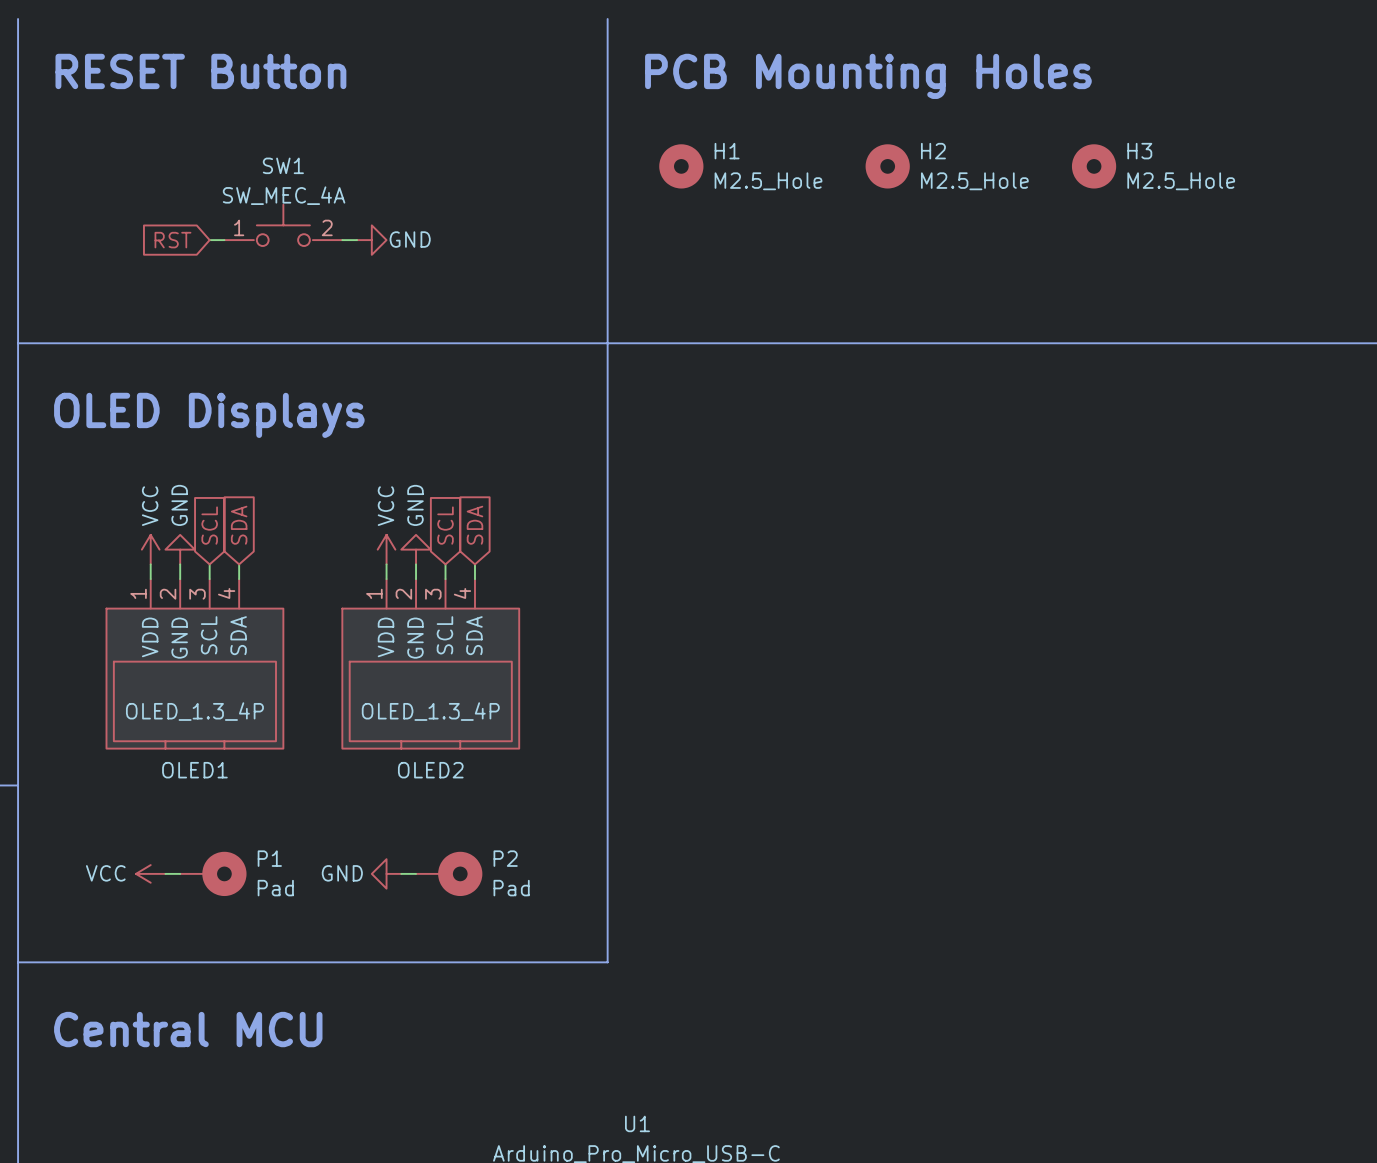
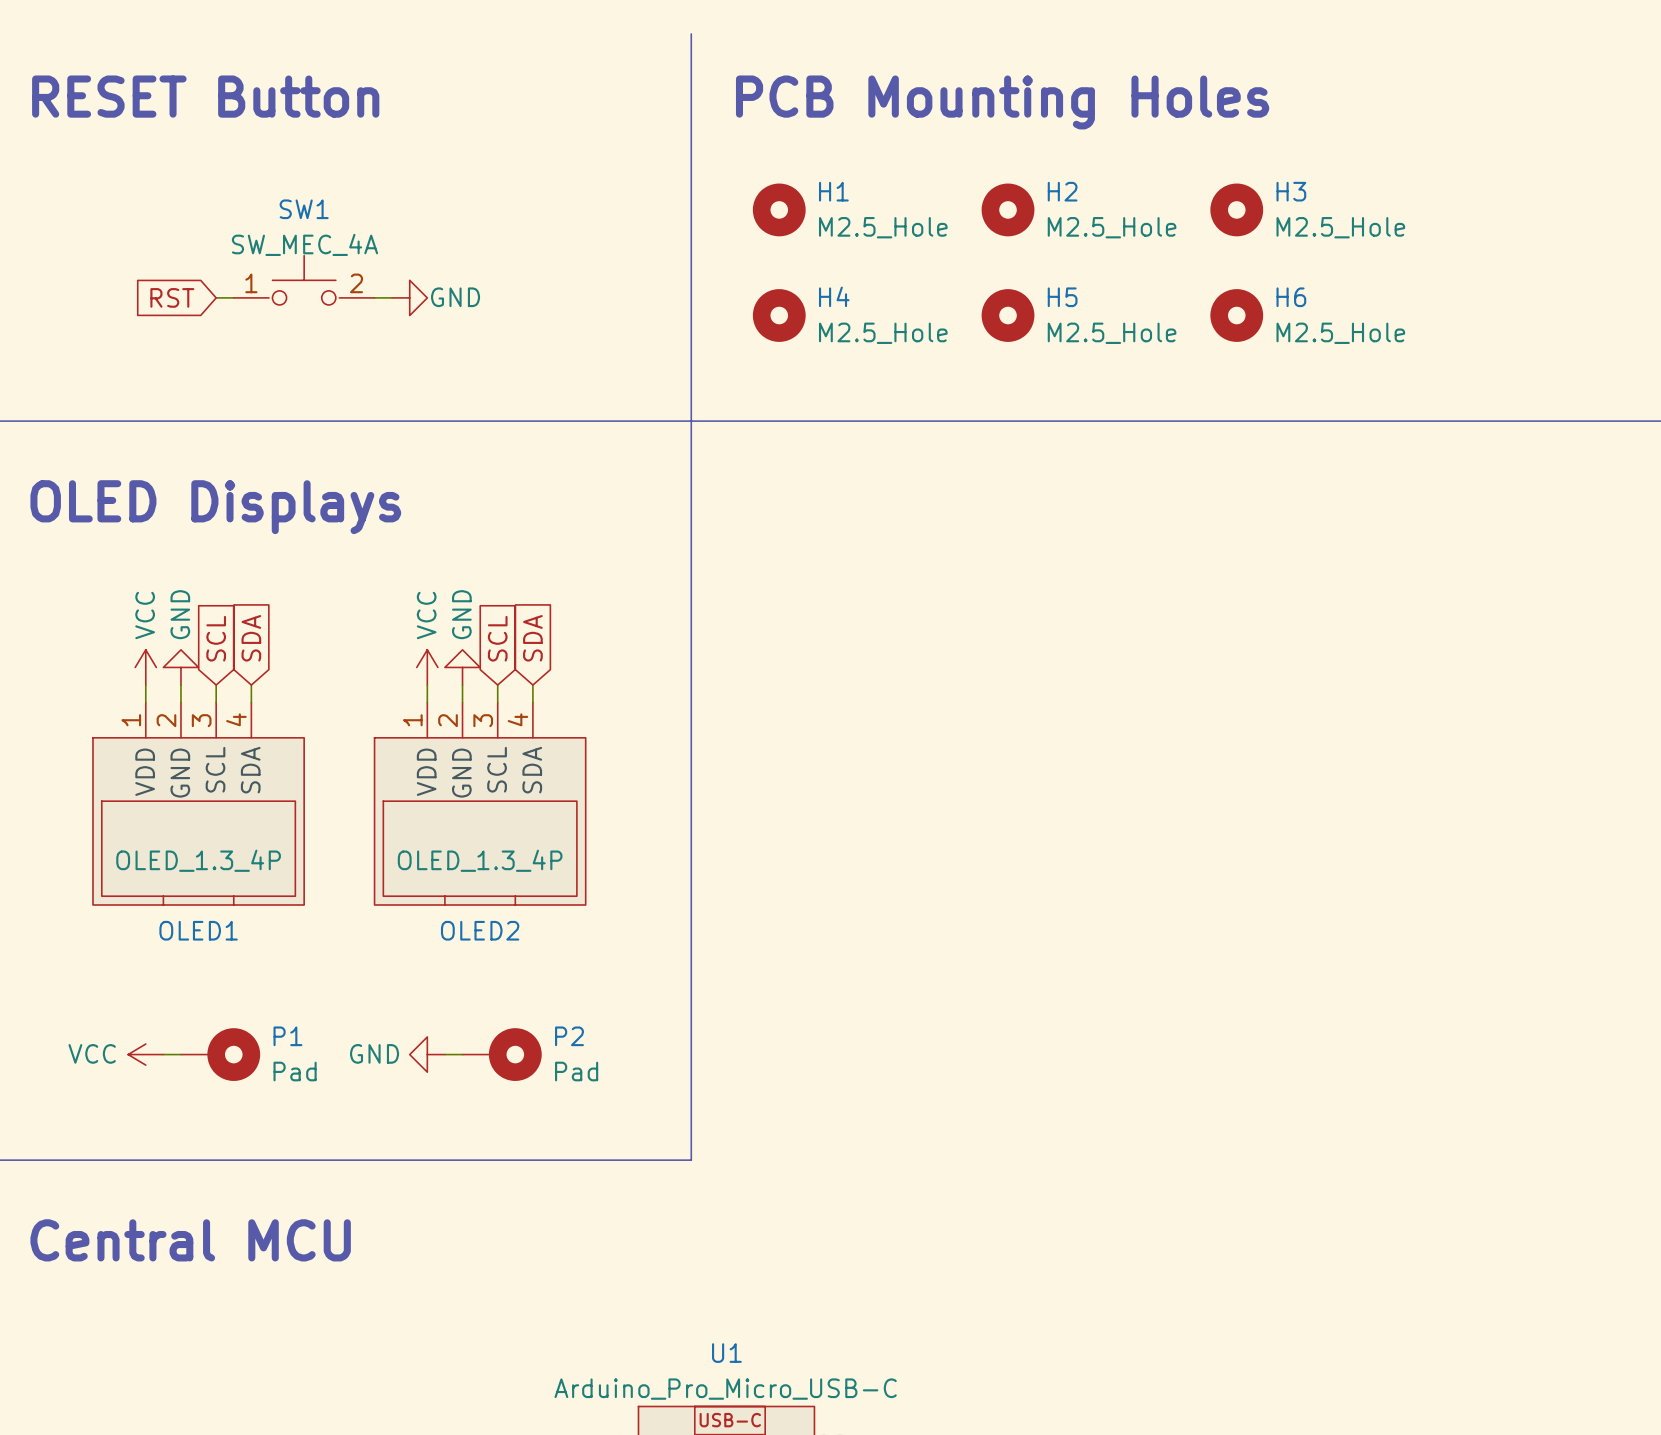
H2 position: (887, 166) -> (1008, 209)
H3 position: (1094, 166) -> (1236, 209)
H4: none -> M2.5_Hole (779, 315)
H5: none -> M2.5_Hole (1008, 315)
H6: none -> M2.5_Hole (1236, 315)

